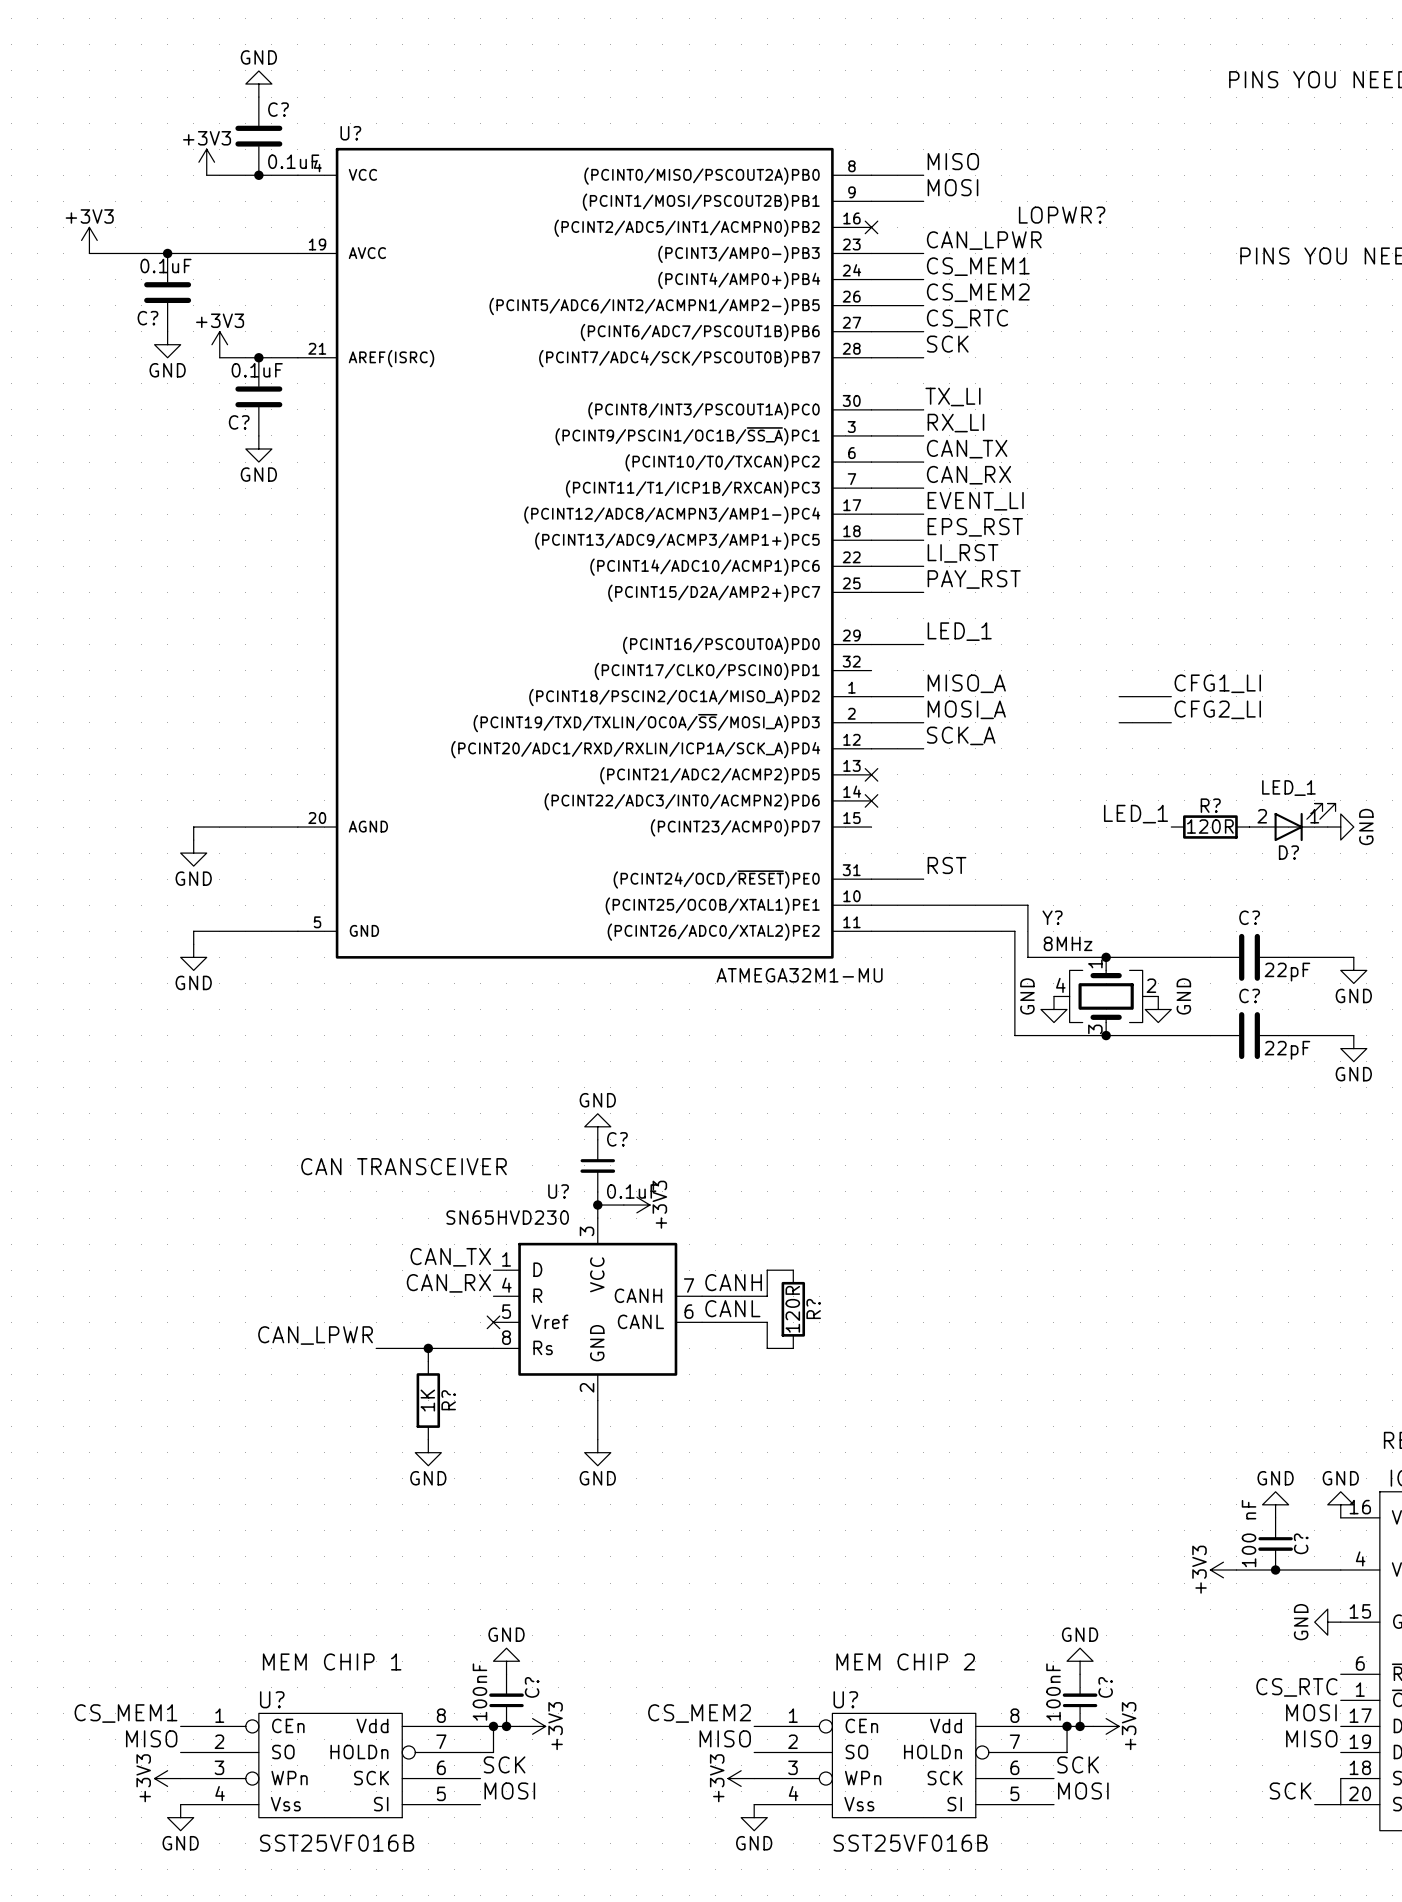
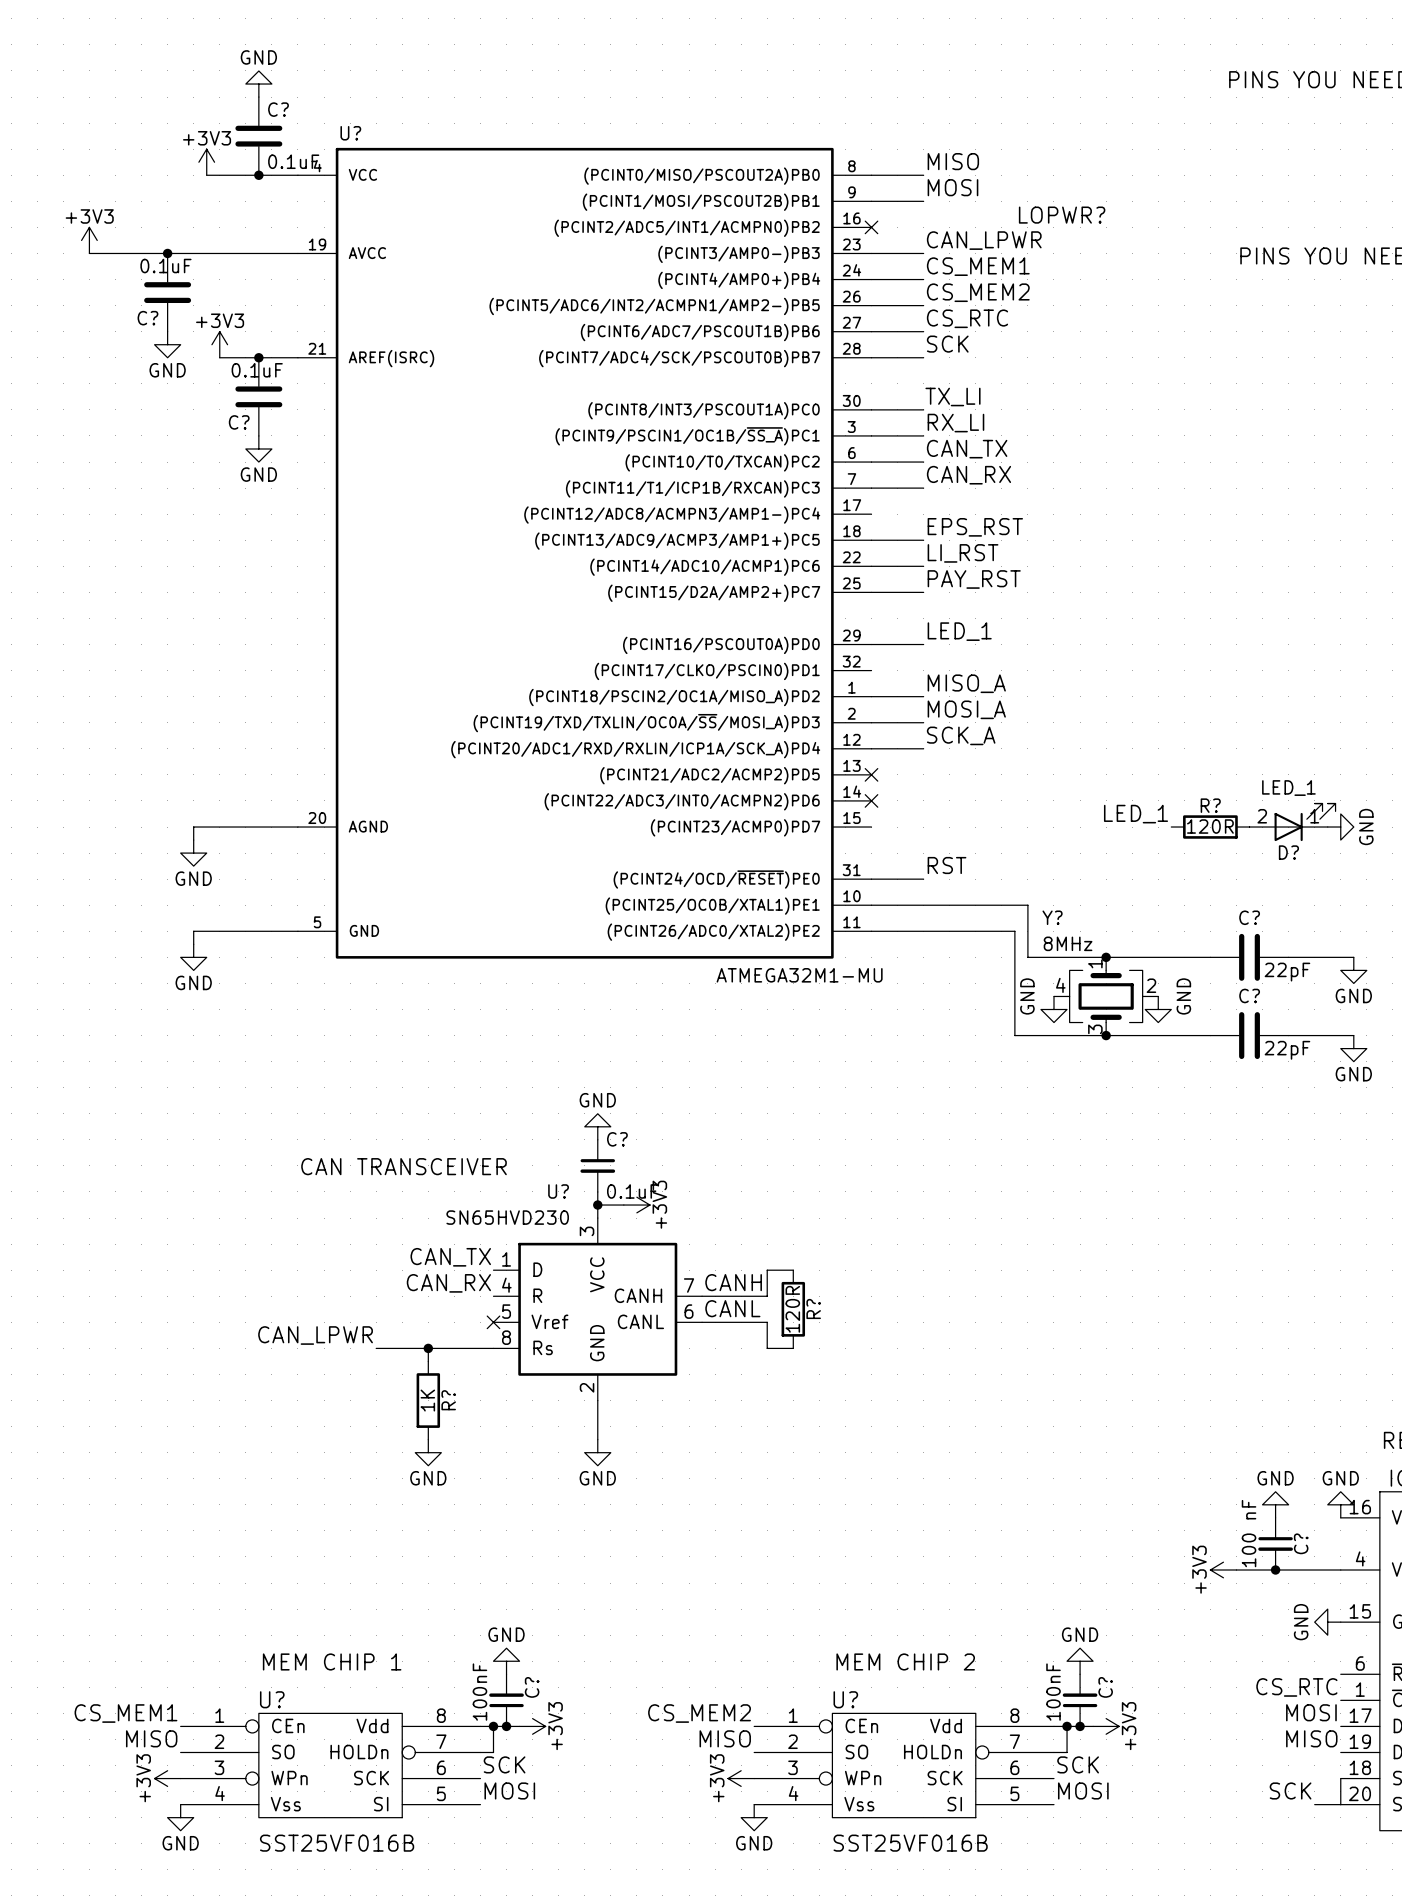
label: EVENT_LI (975, 501) -> none
wire: (871, 514) (923, 514) -> none
label: CFG1_LI (1217, 683) -> none
wire: (1119, 696) (1171, 696) -> none
label: CFG2_LI (1217, 709) -> none
wire: (1119, 722) (1171, 722) -> none

